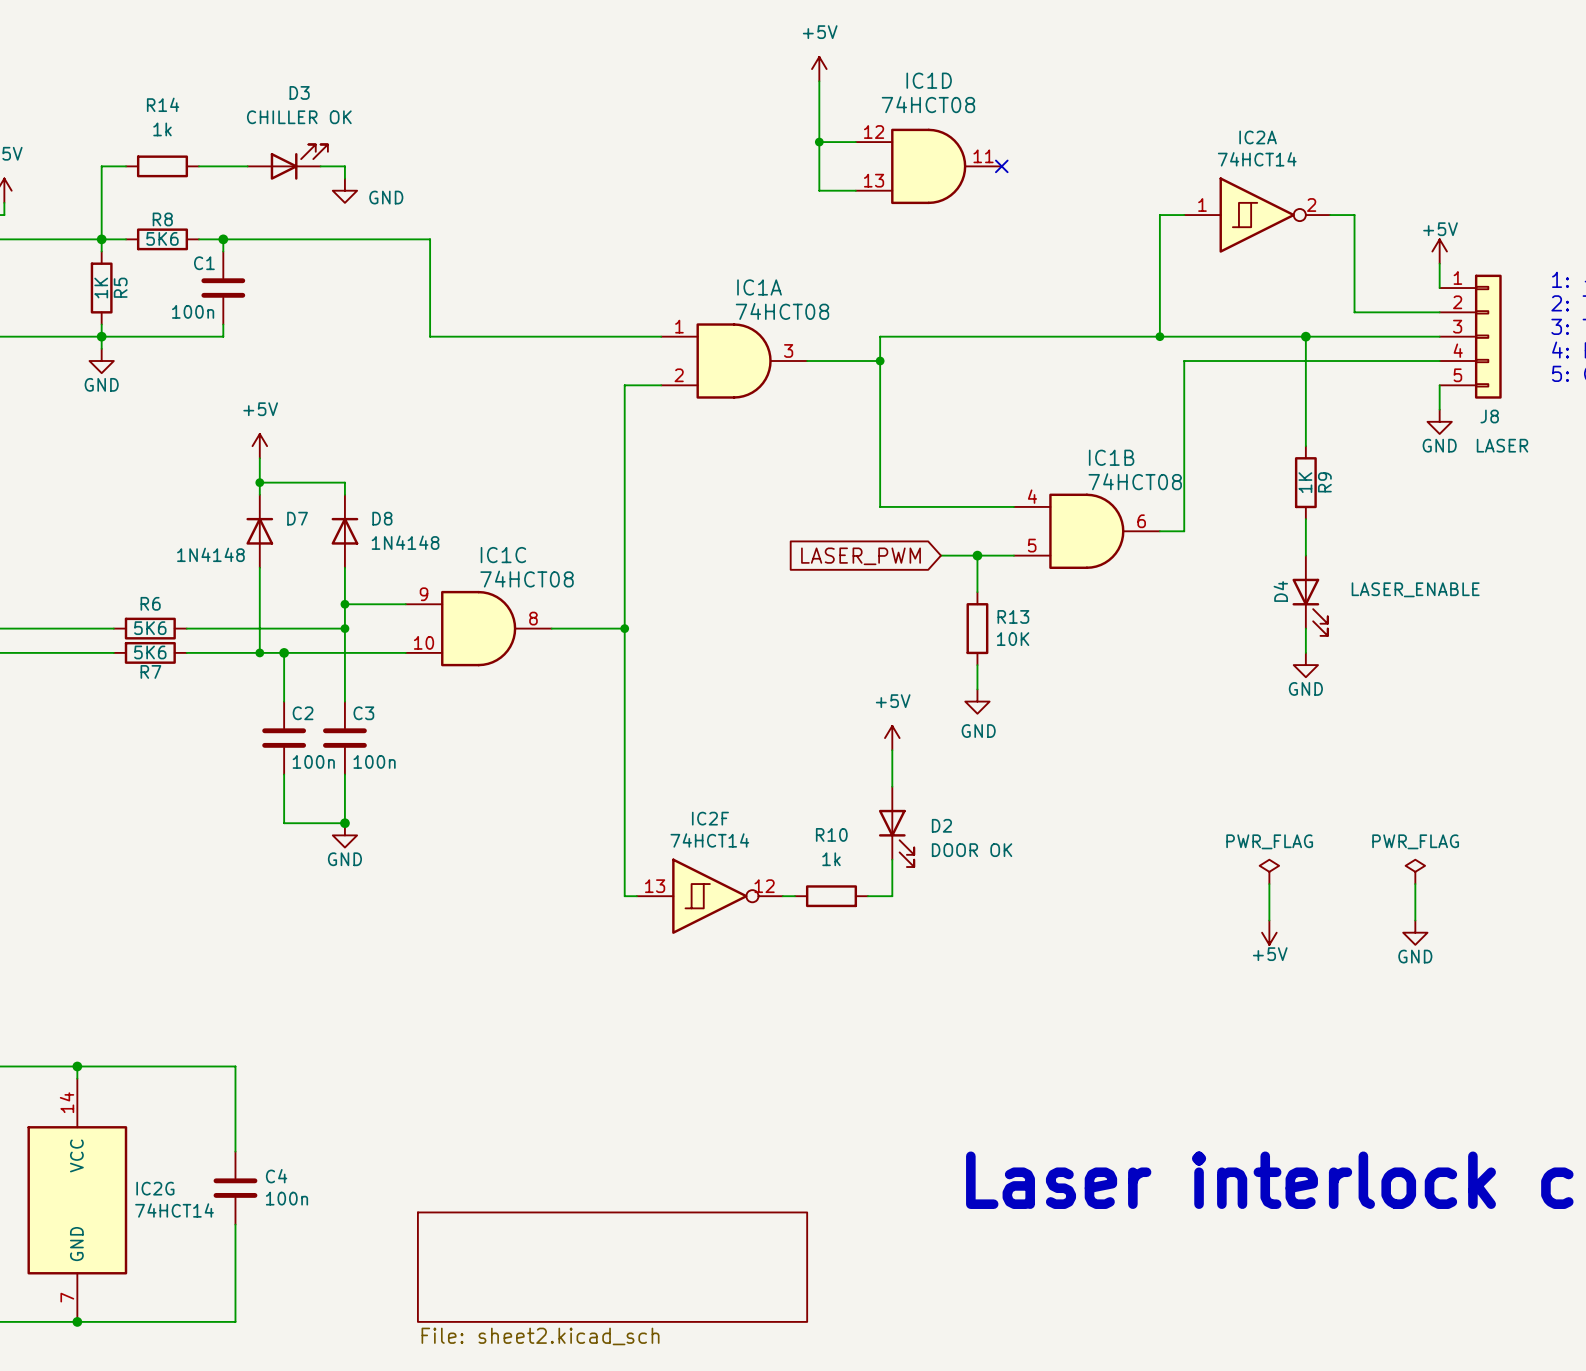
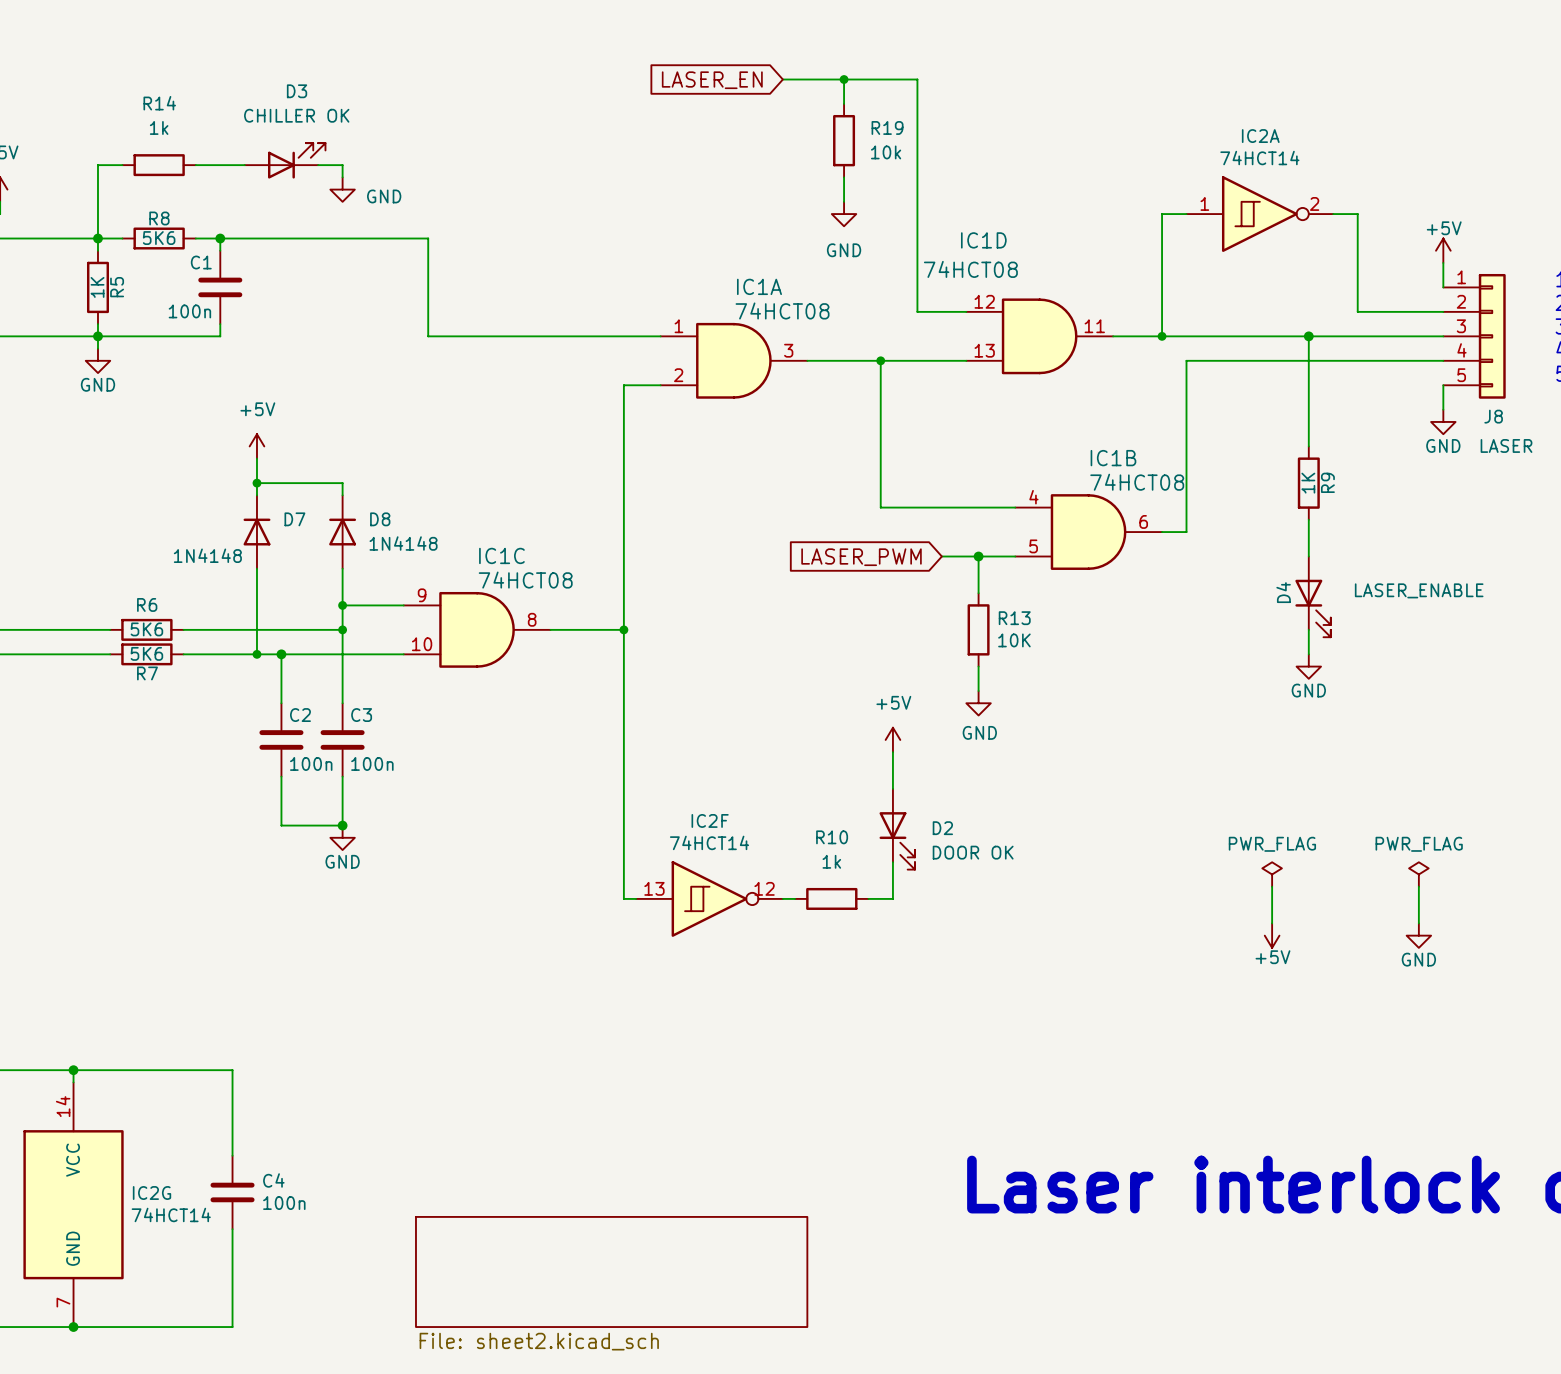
power symbol: +5V (819, 69) -> none
IC1D name position: IC1D (929, 80) -> IC1D (983, 240)
global label: none -> LASER_EN (712, 80)
wire: none -> (782, 79) (917, 79) (917, 311) (966, 311)
wire: (819, 81) (819, 190) (855, 190) -> none
wire: none -> (844, 79) (844, 103)
junction: none -> (844, 79)
IC1D value position: 74HCT08 (928, 104) -> 74HCT08 (970, 269)
wire: (819, 142) (855, 142) -> none
junction: (819, 142) -> none
R19: none -> 10k (844, 140)
IC1D position: (928, 166) -> (1039, 336)
no-connect mark: (1001, 166) -> none
wire: none -> (844, 177) (844, 201)
power symbol: none -> GND (844, 214)
wire: (1111, 336) (880, 336) (880, 361) -> (966, 360) (880, 360)

